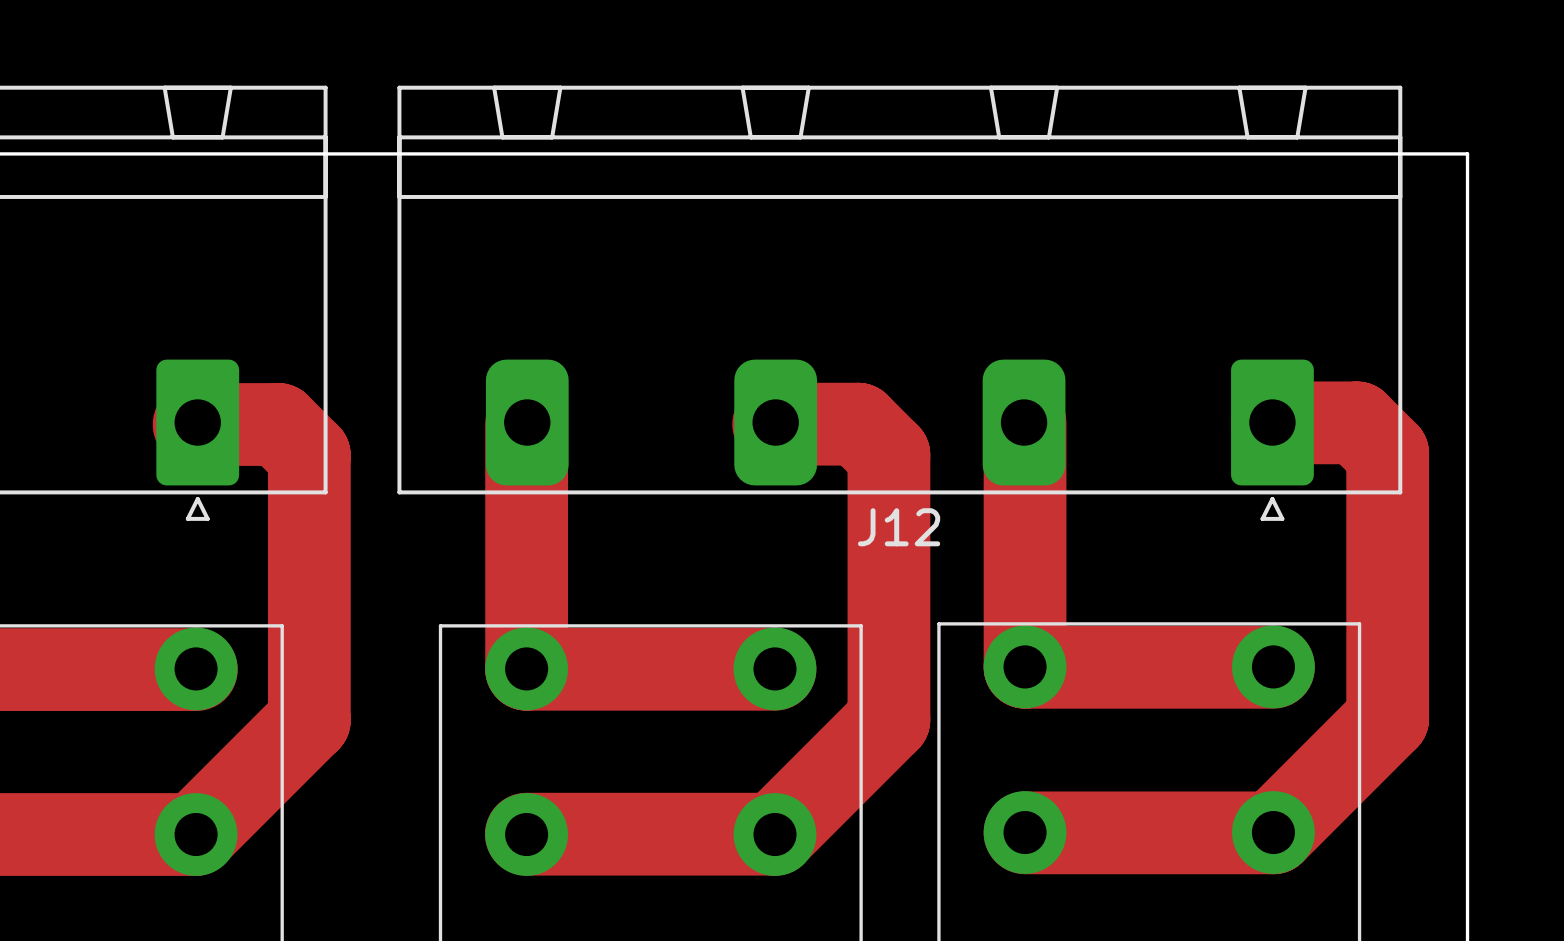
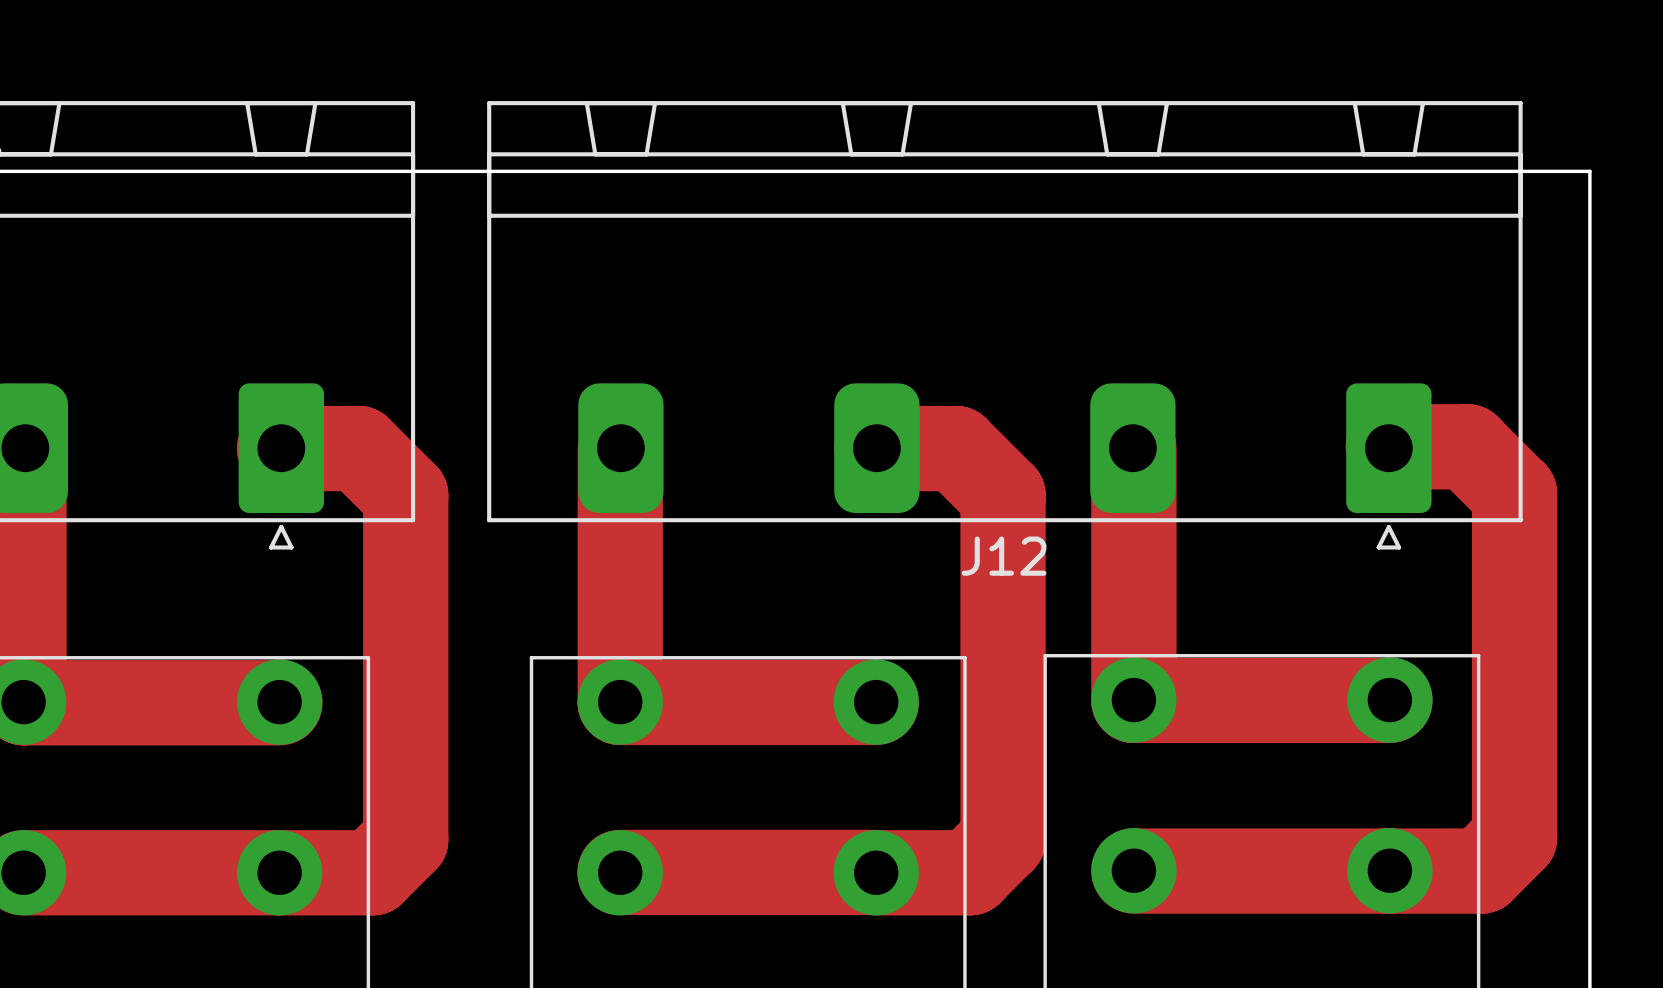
track: (1272, 422) (1356, 422) (1387, 453) (1387, 718) (1273, 832) -> (1388, 446) (1467, 446) (1514, 493) (1514, 837) (1481, 871) (1389, 871)
track: (194, 424) (278, 424) (309, 455) (309, 720) (195, 834) -> (279, 448) (358, 448) (405, 495) (405, 839) (372, 872) (278, 872)
track: (773, 424) (858, 424) (888, 454) (888, 719) (774, 834) -> (876, 448) (956, 448) (1003, 495) (1003, 839) (969, 872) (875, 872)

